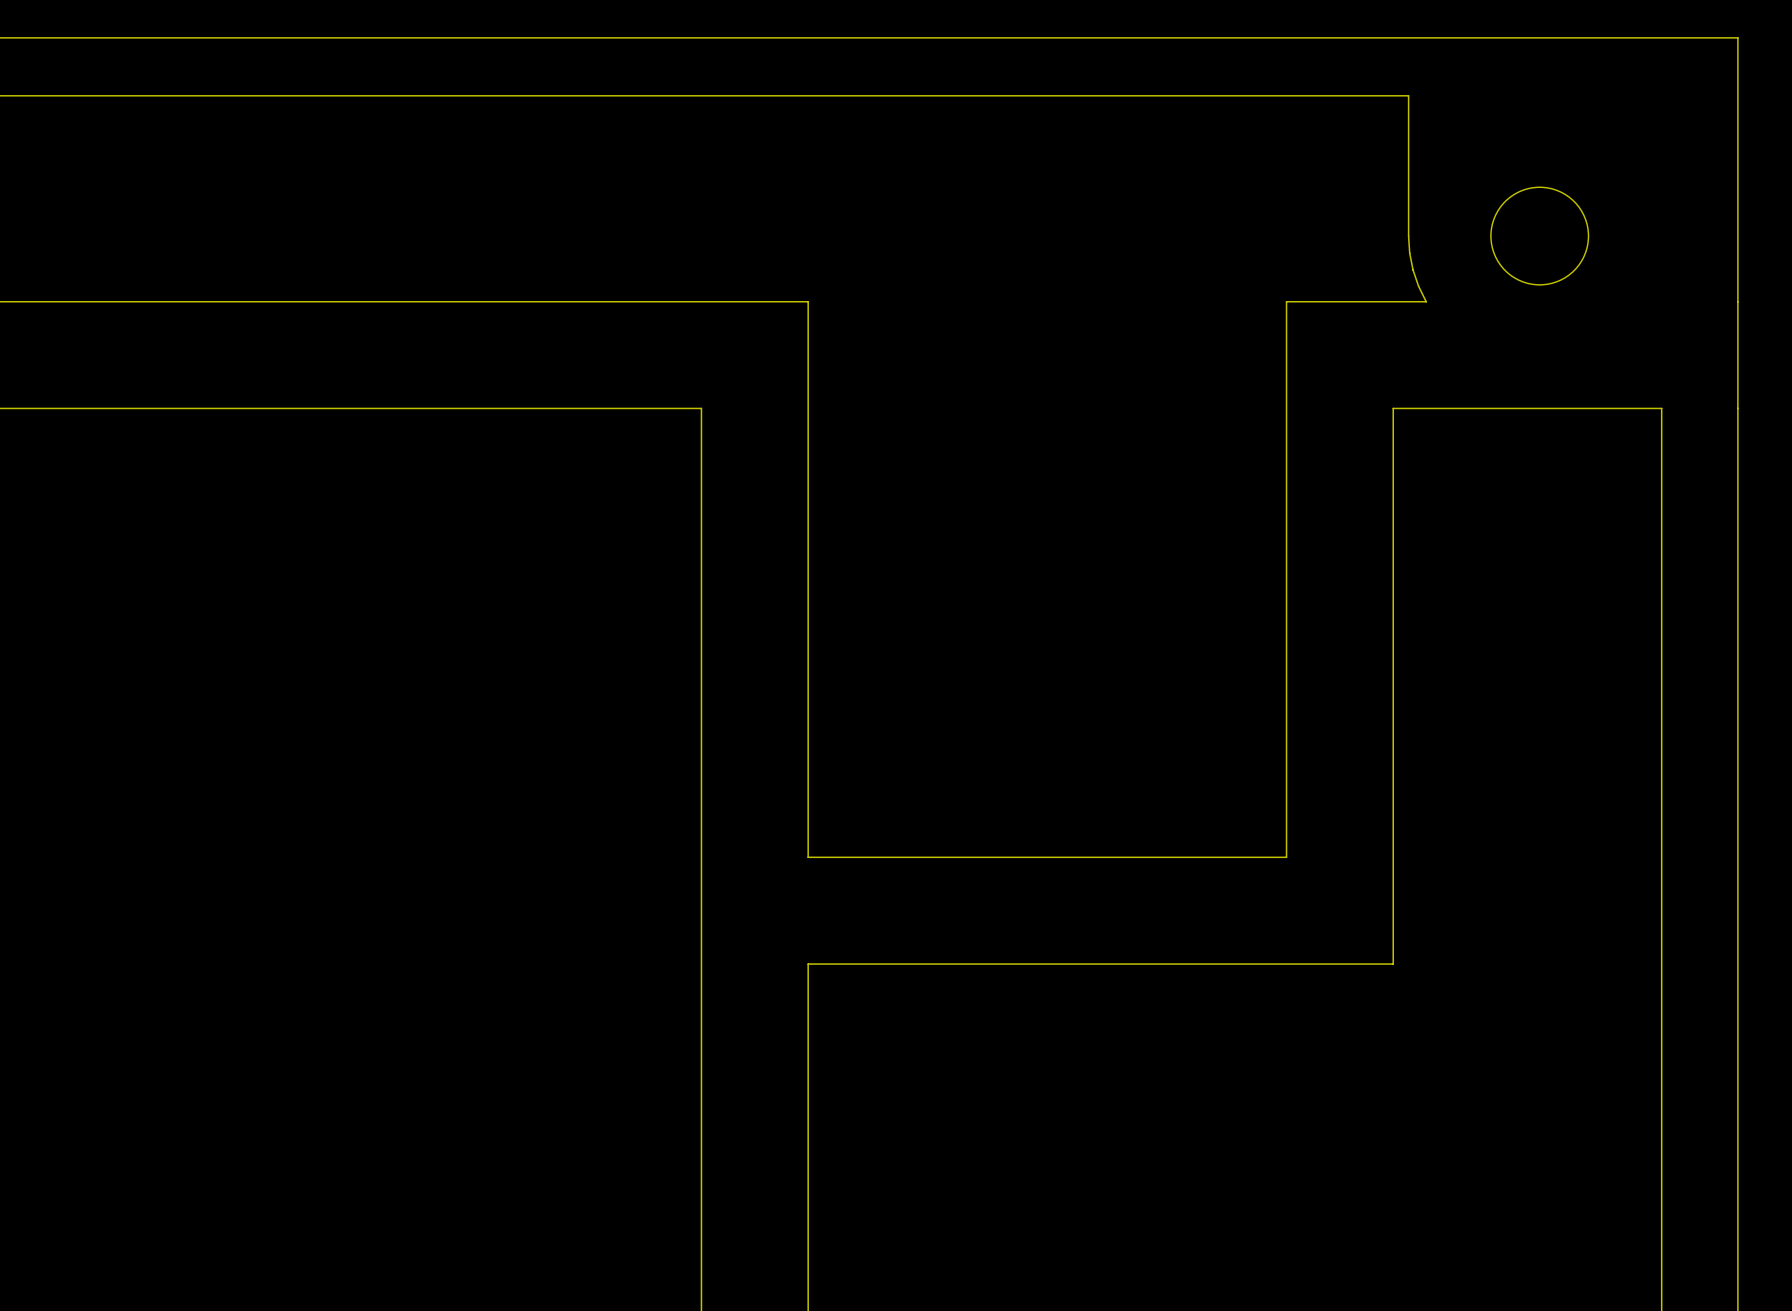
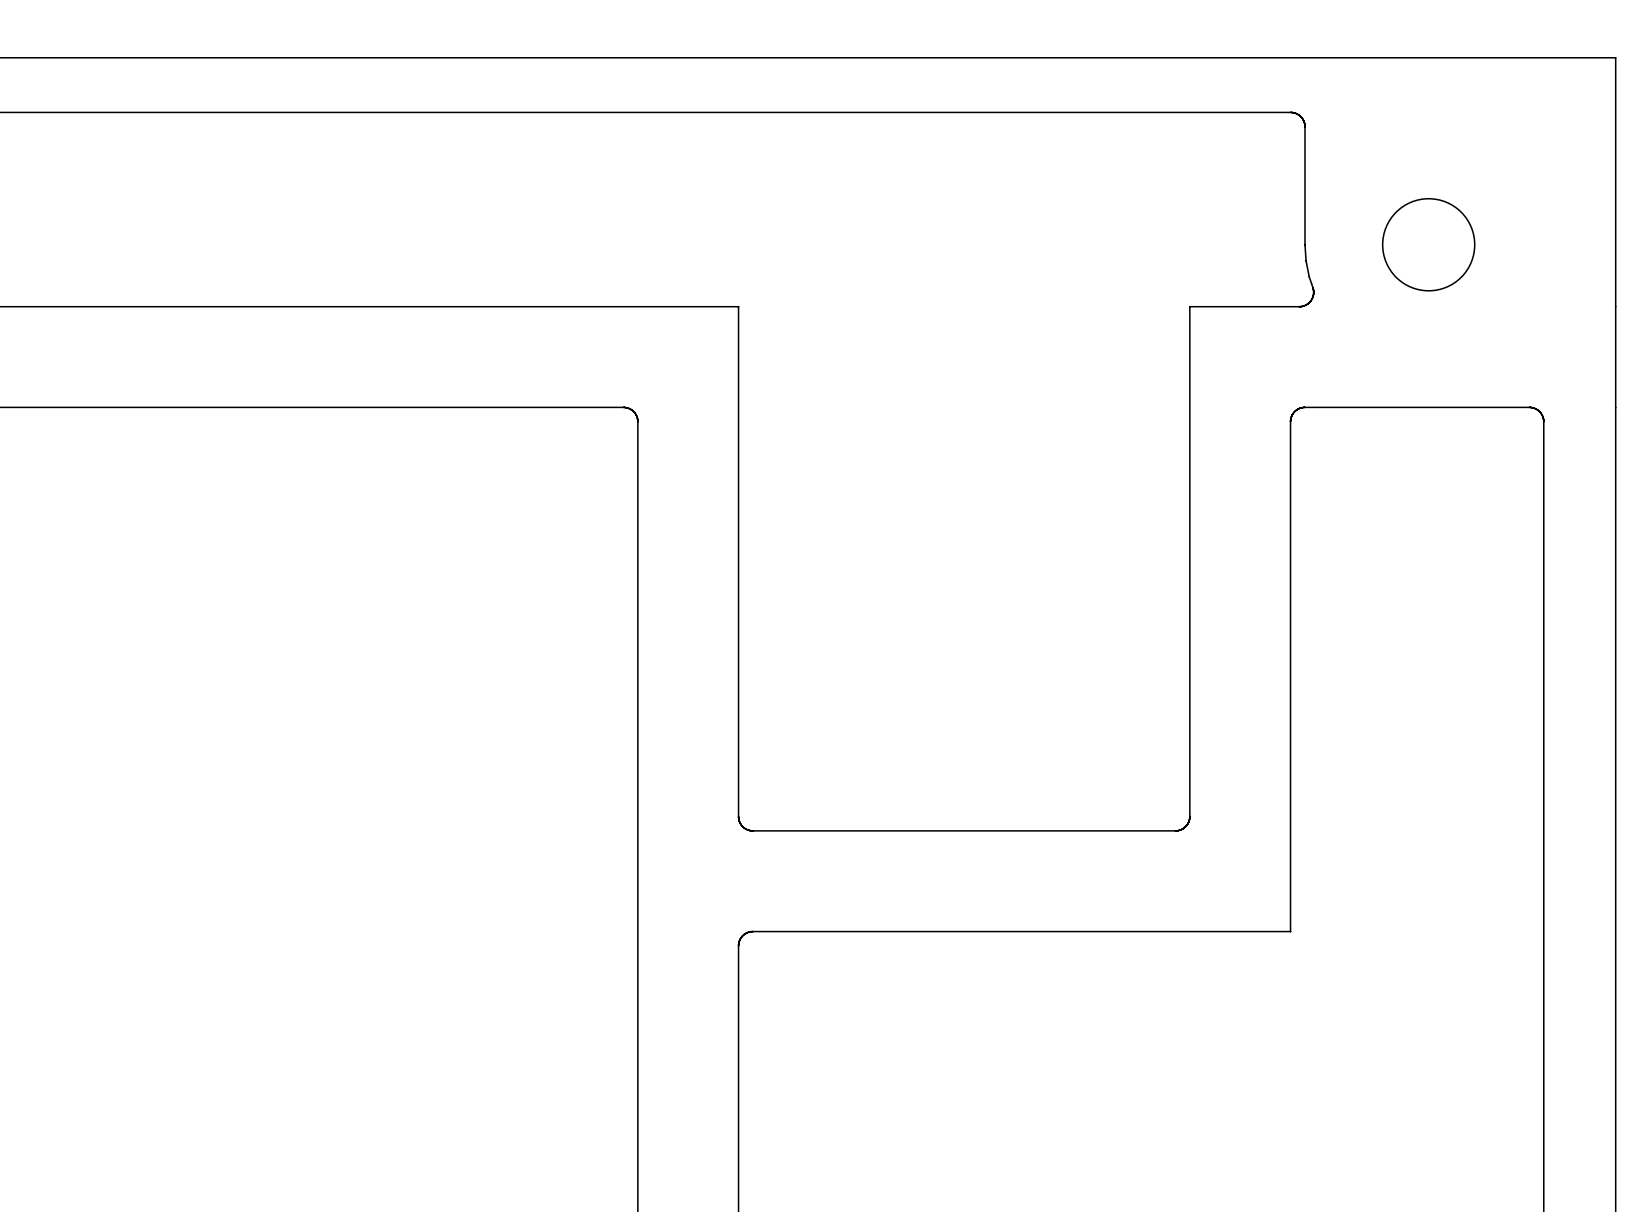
board edge: (1393, 95) (1408, 95) (1408, 111) -> none
board edge: (1416, 281) (1426, 301) (1402, 301) -> none
board edge: (686, 408) (701, 408) (701, 423) -> none
board edge: (1408, 408) (1393, 408) (1393, 423) -> none
board edge: (1646, 408) (1661, 408) (1661, 423) -> none
board edge: (808, 842) (808, 857) (823, 857) -> none
board edge: (1286, 842) (1286, 857) (1271, 857) -> none
board edge: (823, 964) (808, 964) (808, 979) -> none

